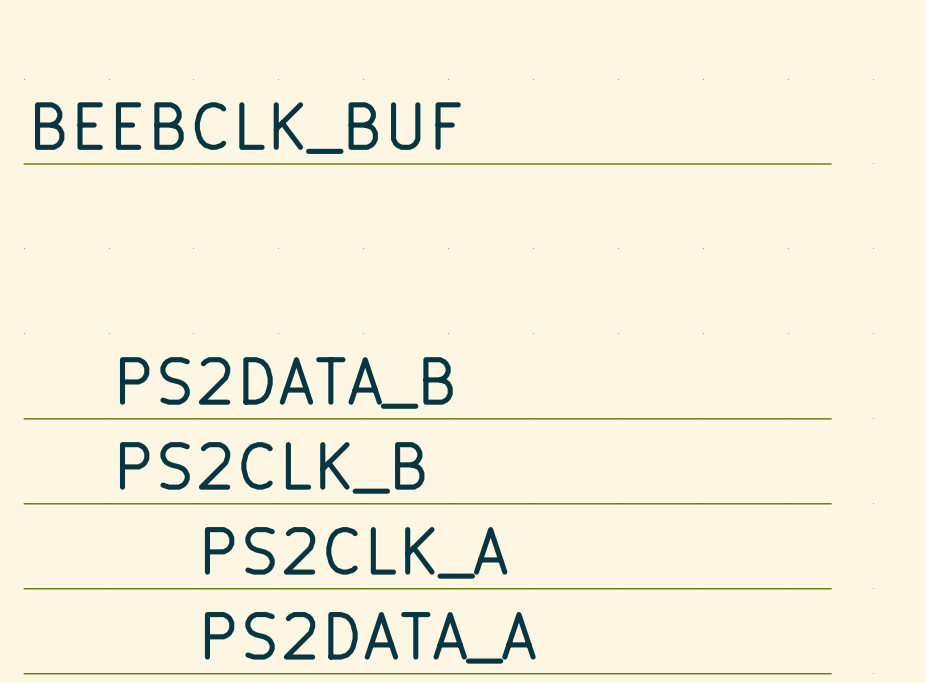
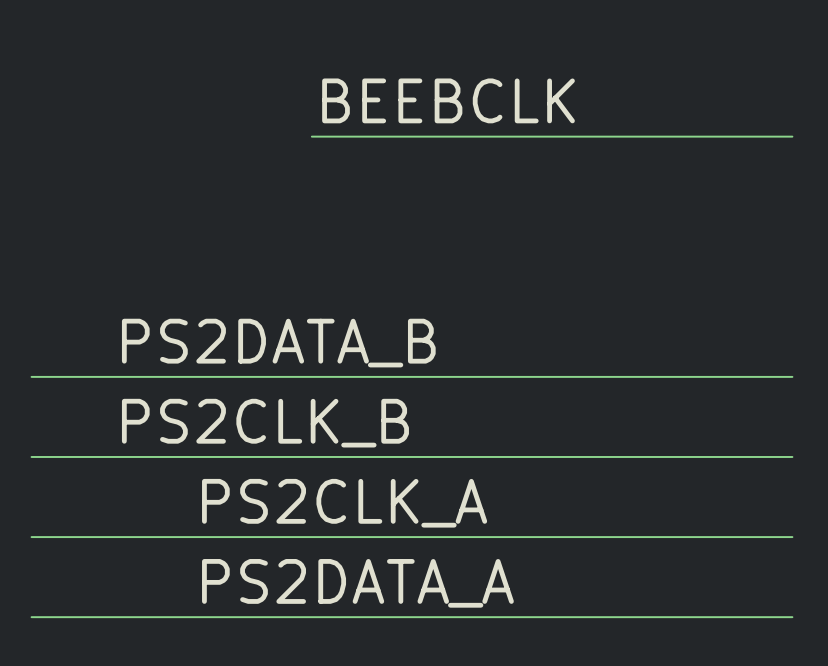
label: BEEBCLK_BUF (247, 128) -> BEEBCLK (448, 100)
wire: (24, 163) (321, 163) -> none

